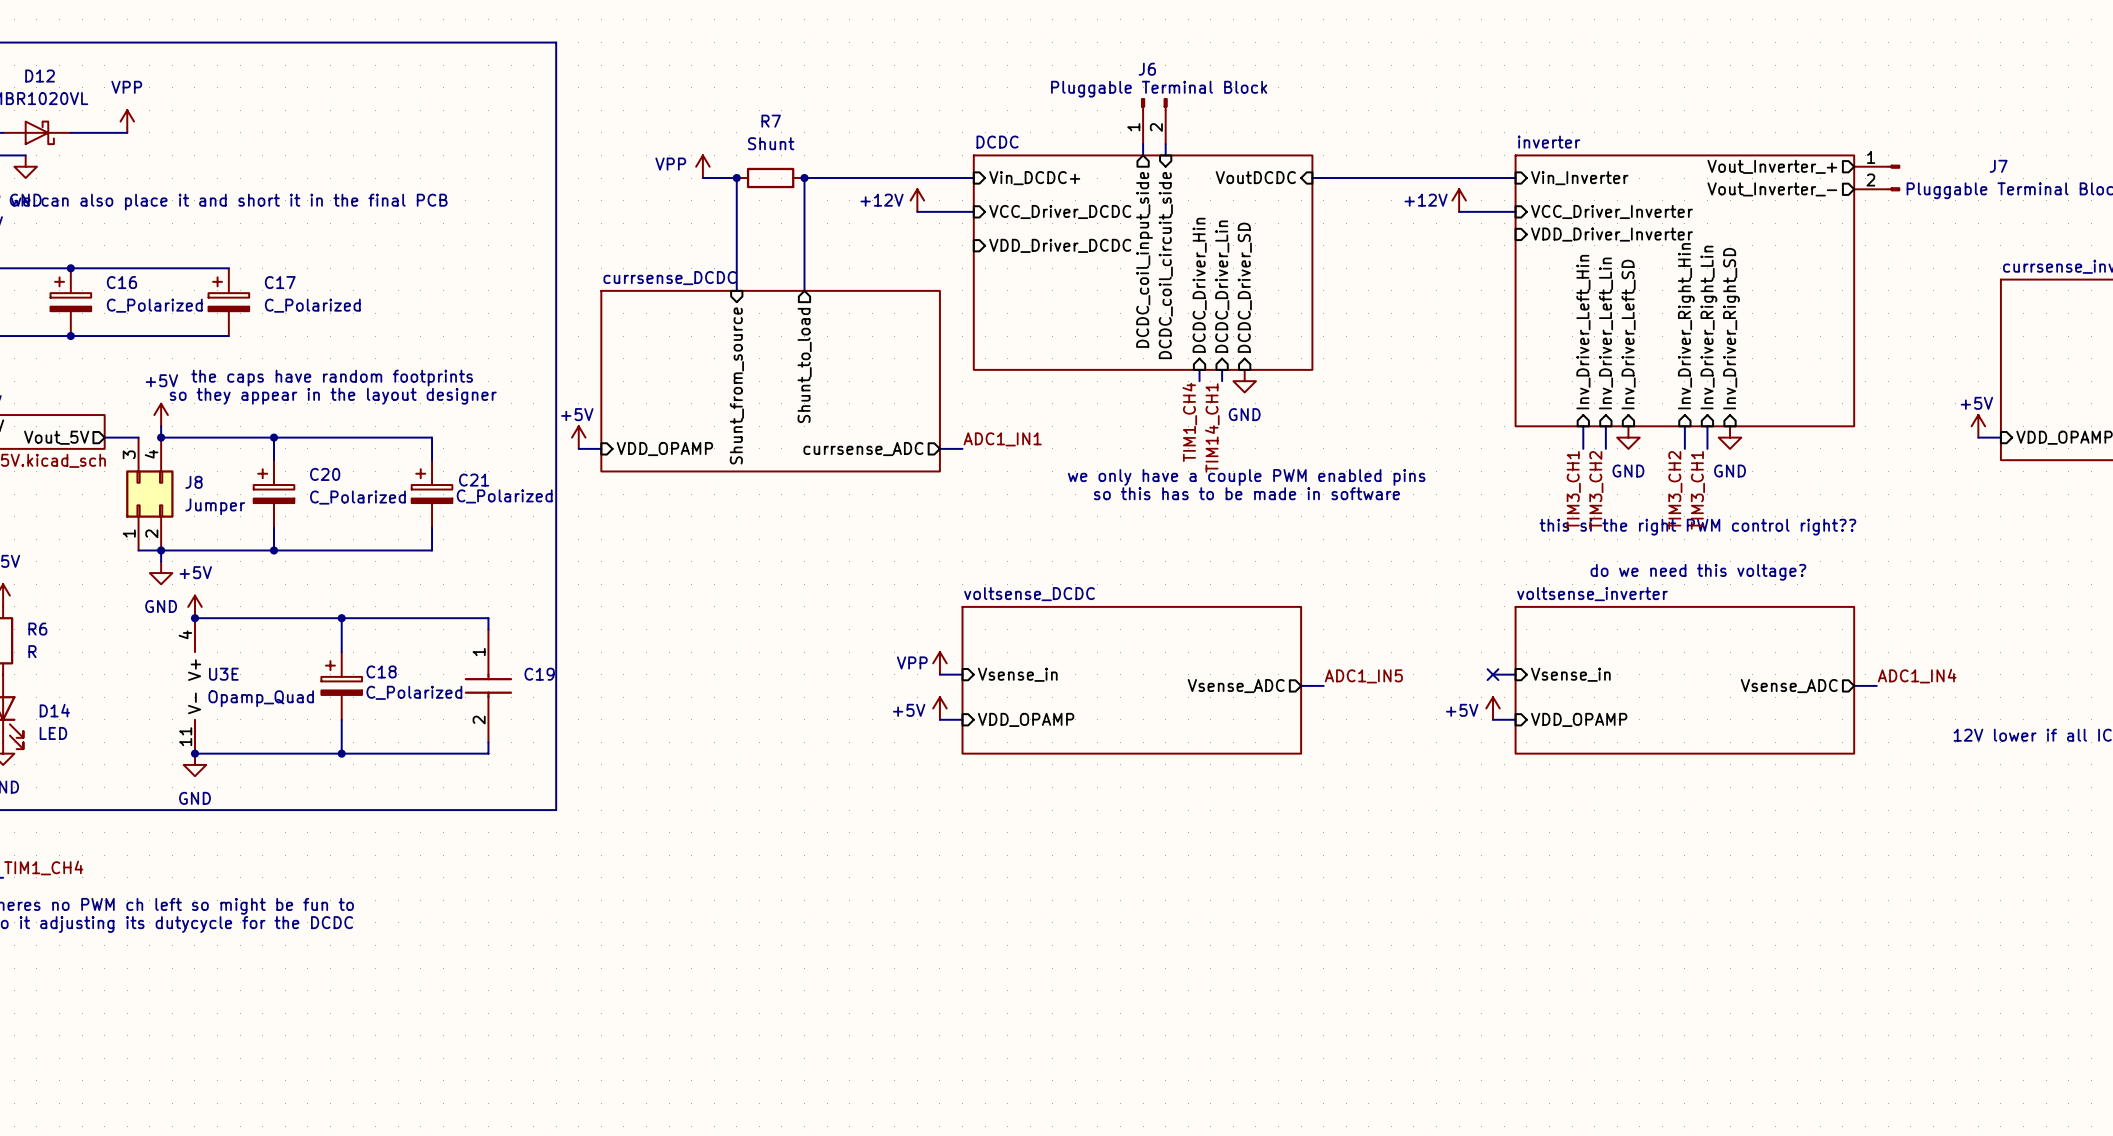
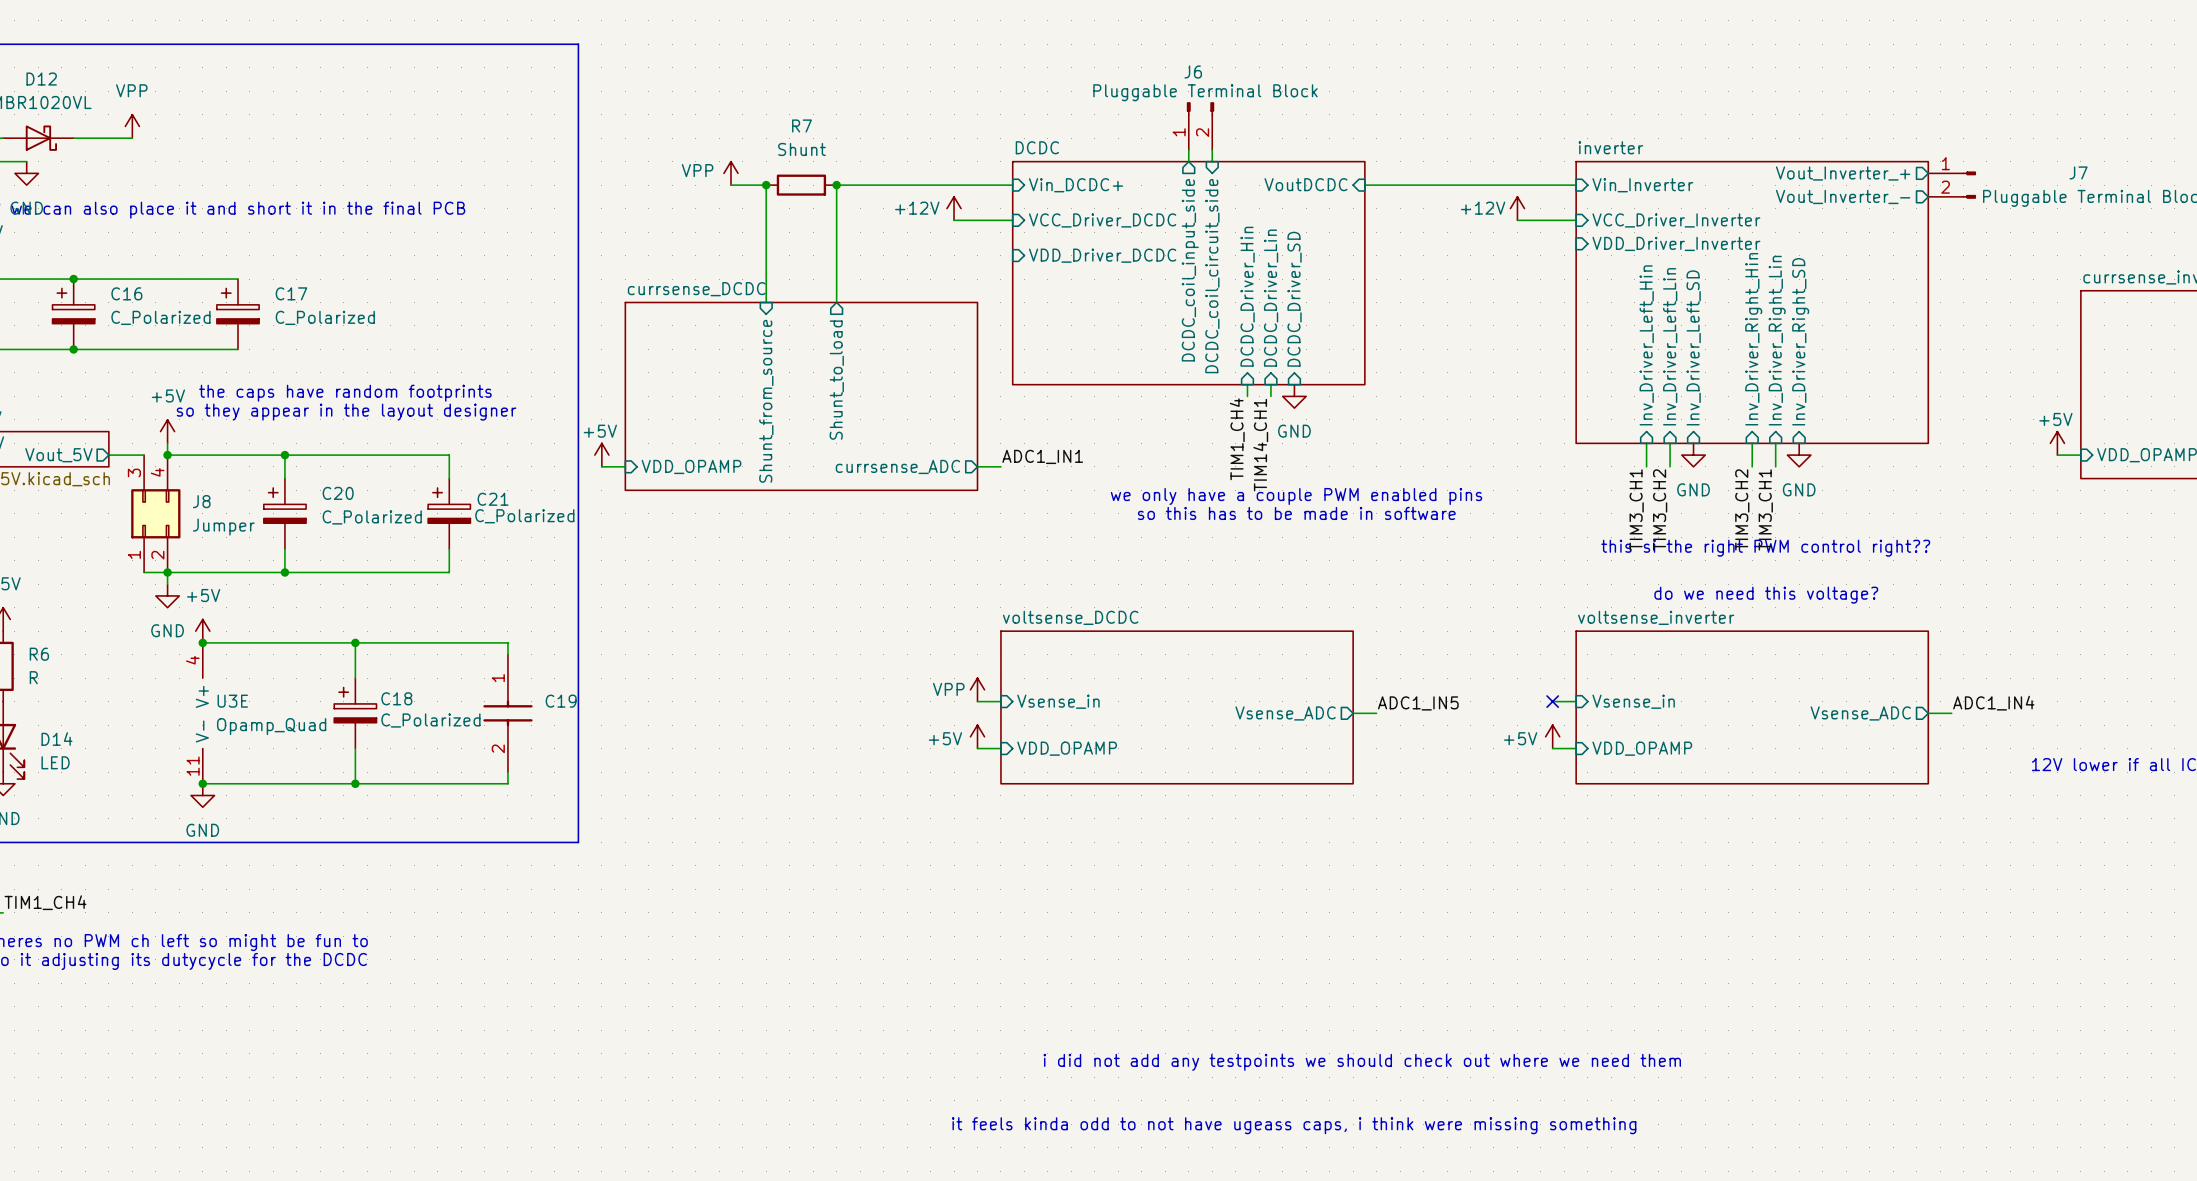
text: none -> i did not add any testpoints we should check out where we need them (1362, 1062)
text: none -> it feels kinda odd to not have ugeass caps, i think were missing something (1294, 1125)

